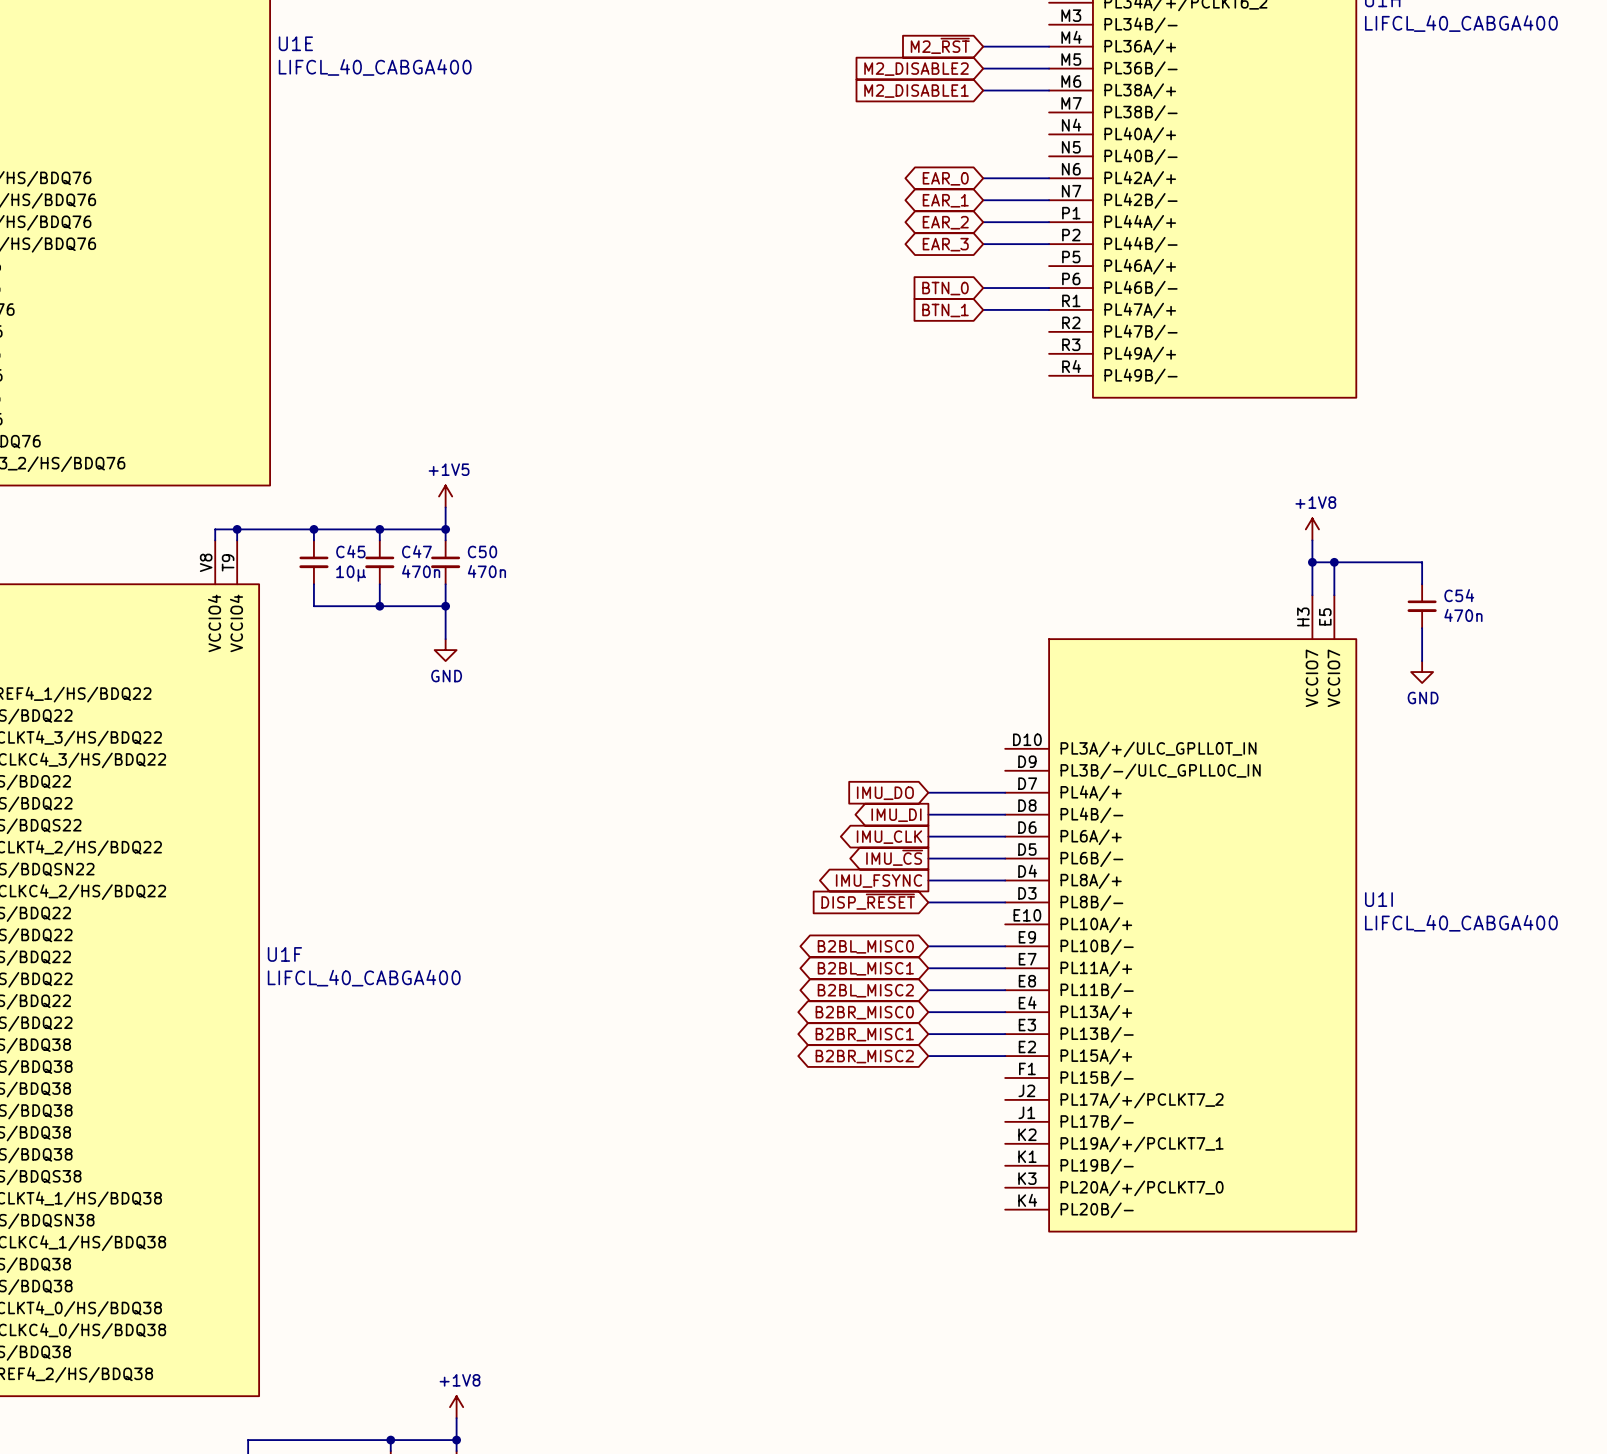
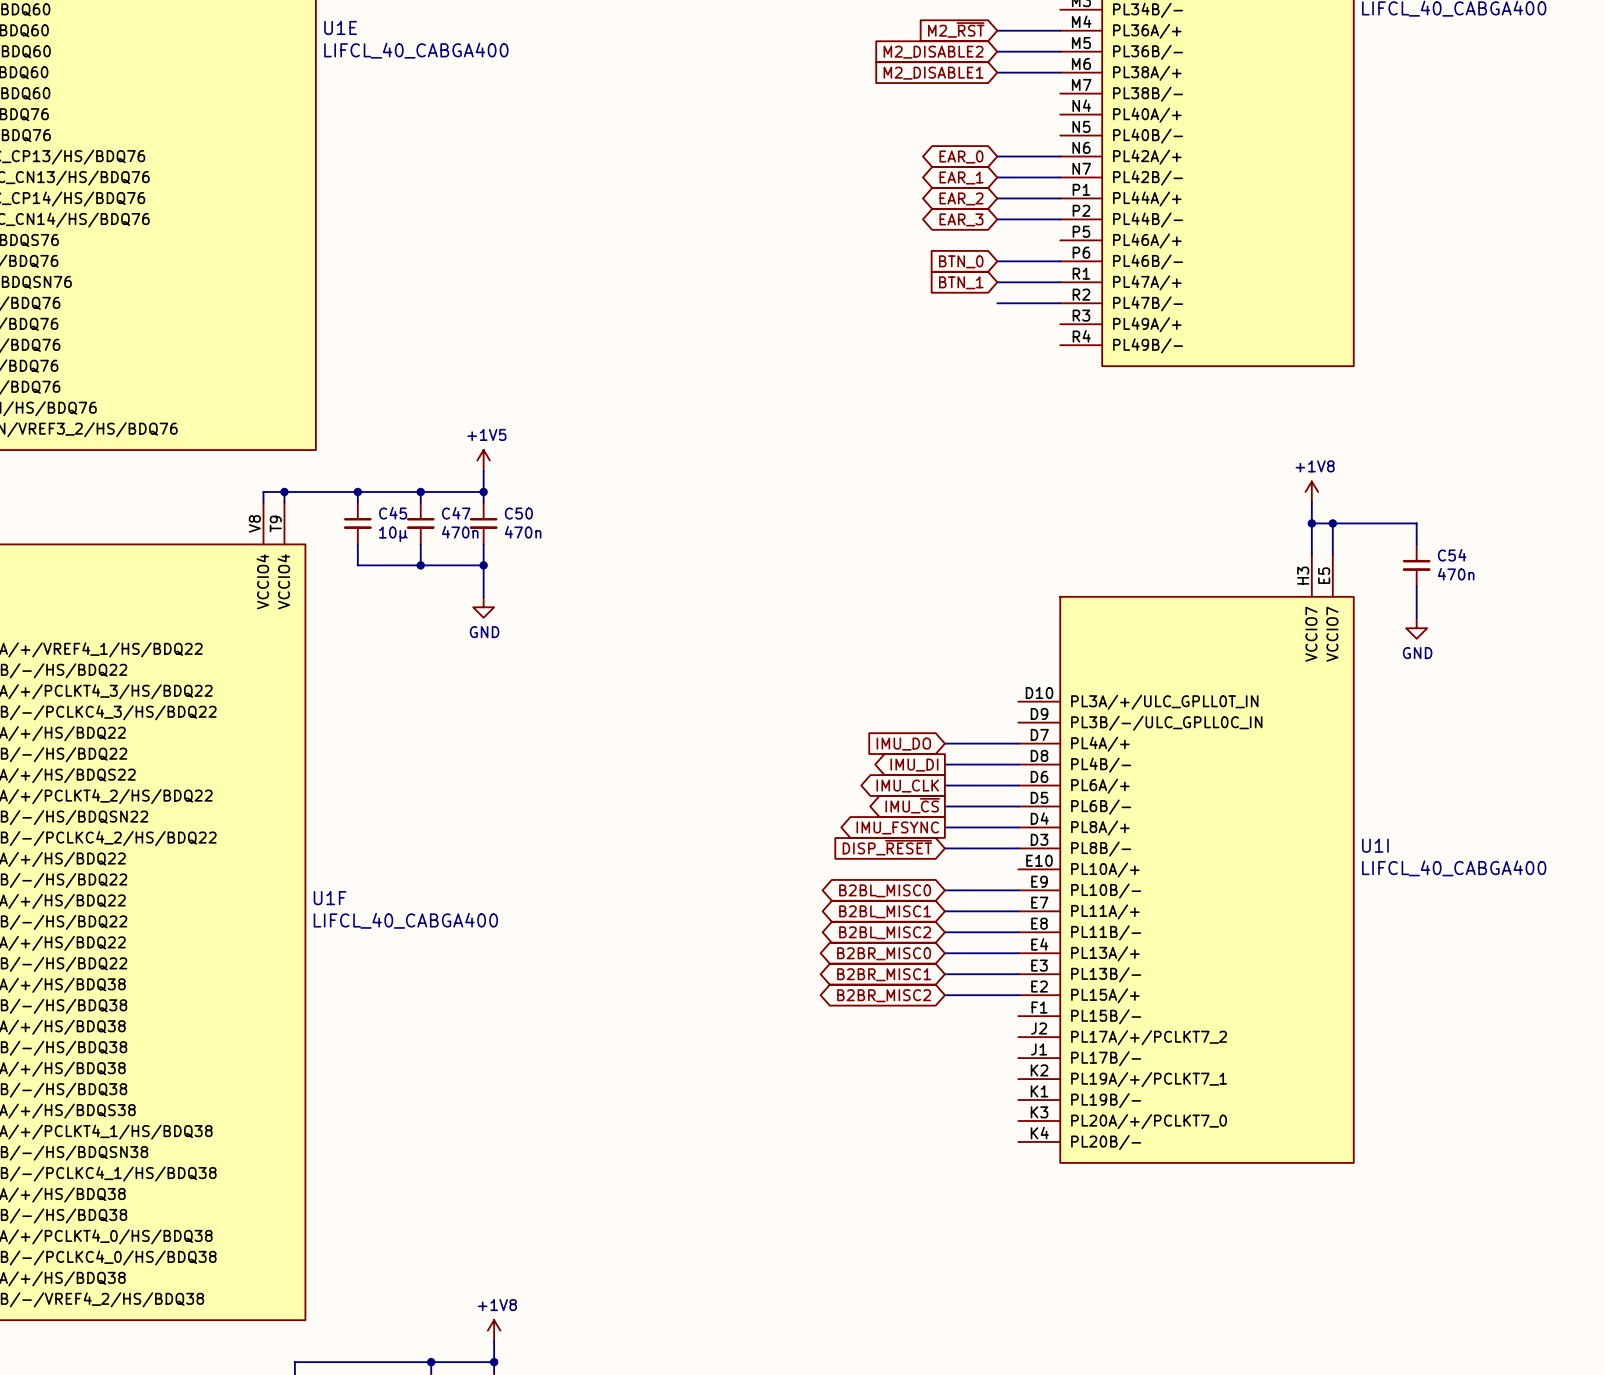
wire: none -> (997, 303) (1060, 303)

